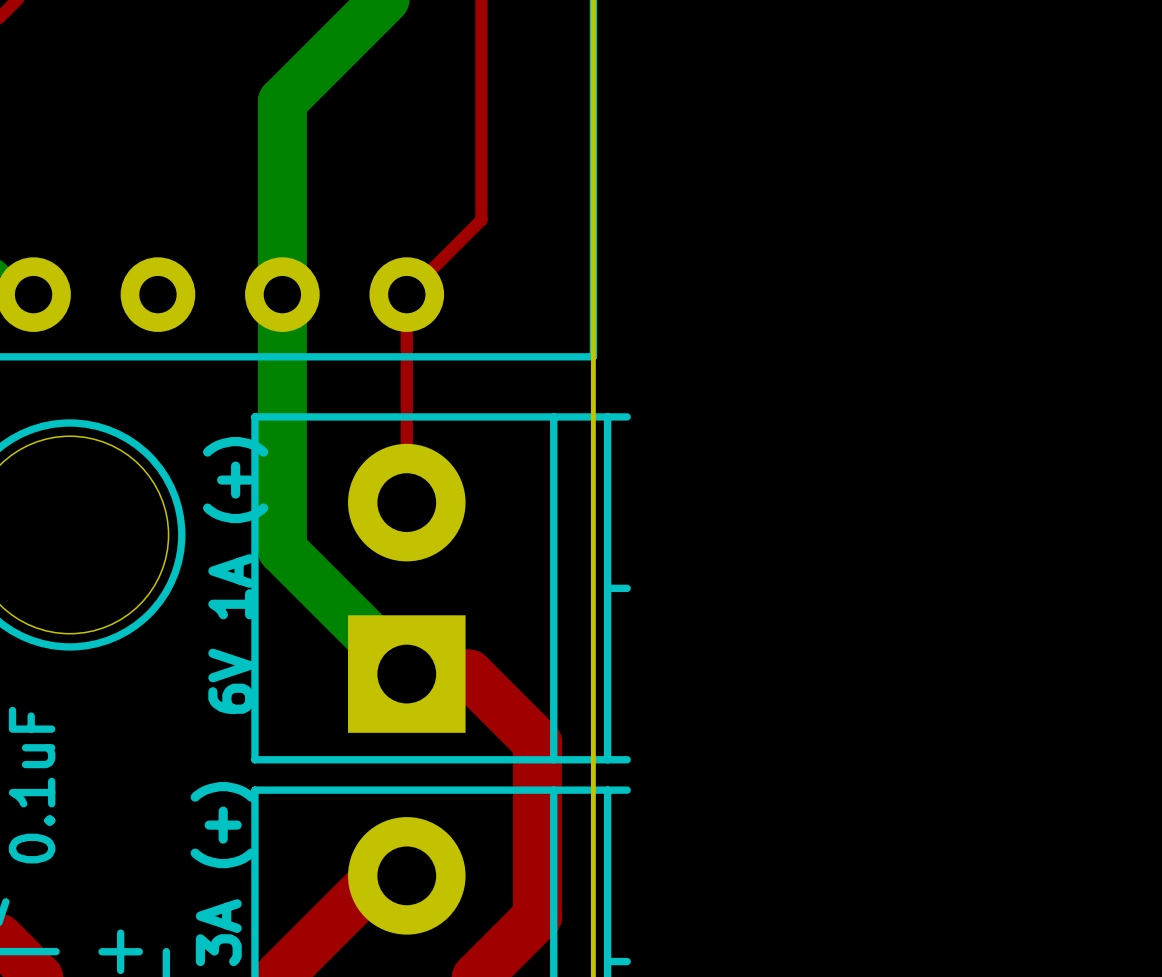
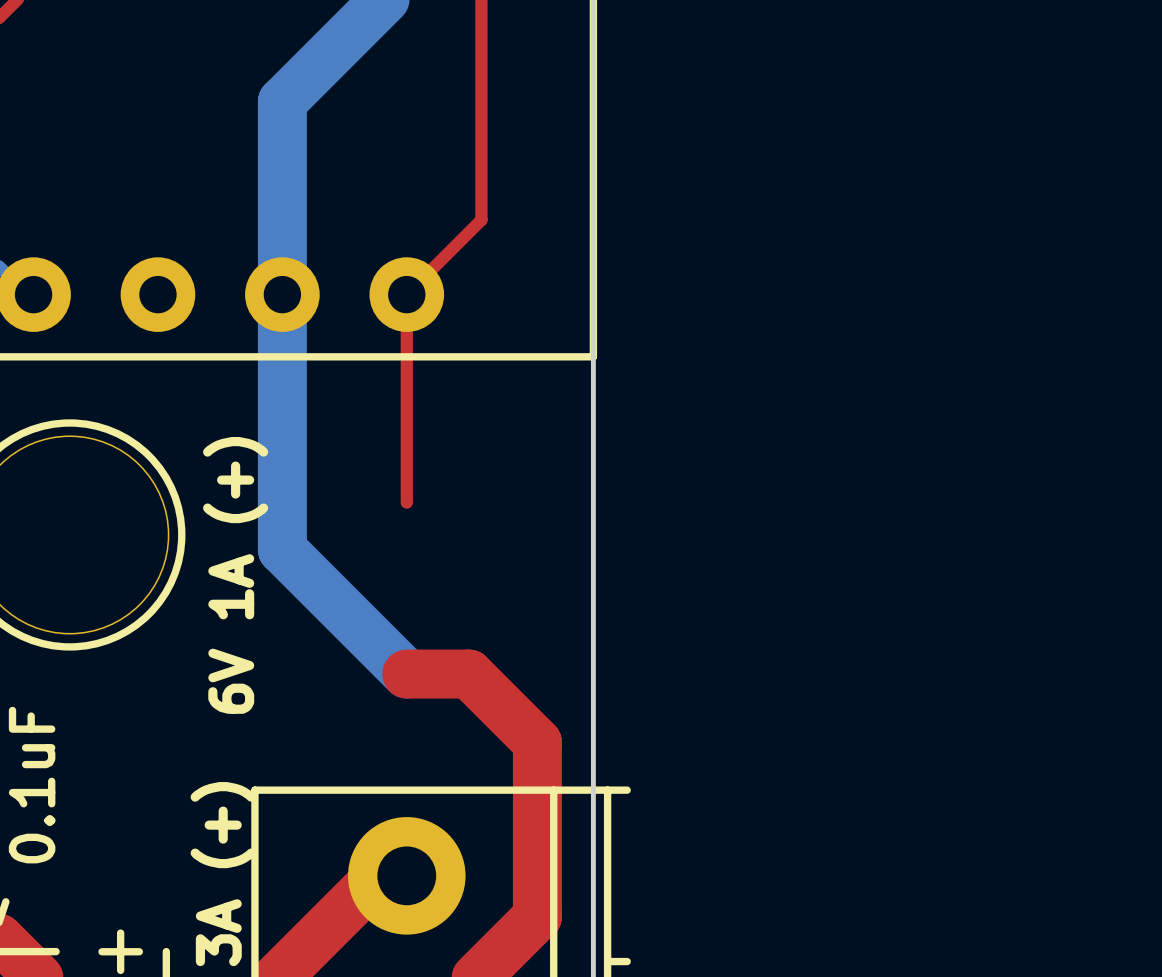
part: (441, 588) -> none

